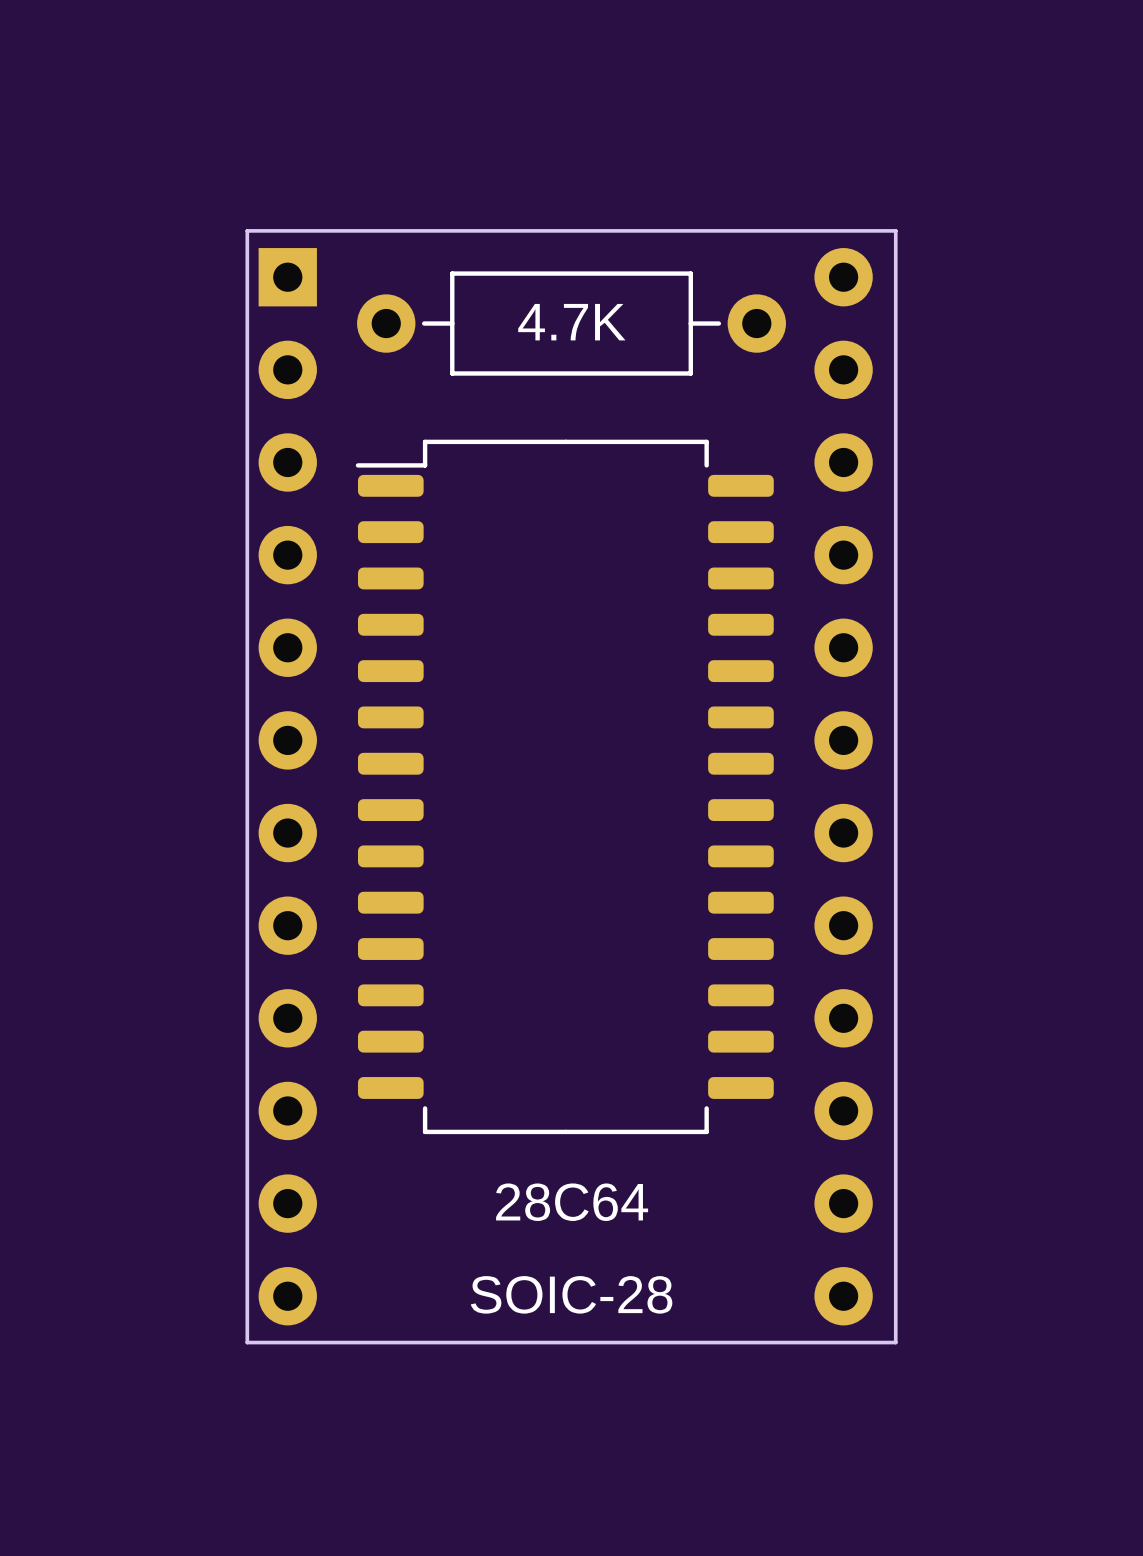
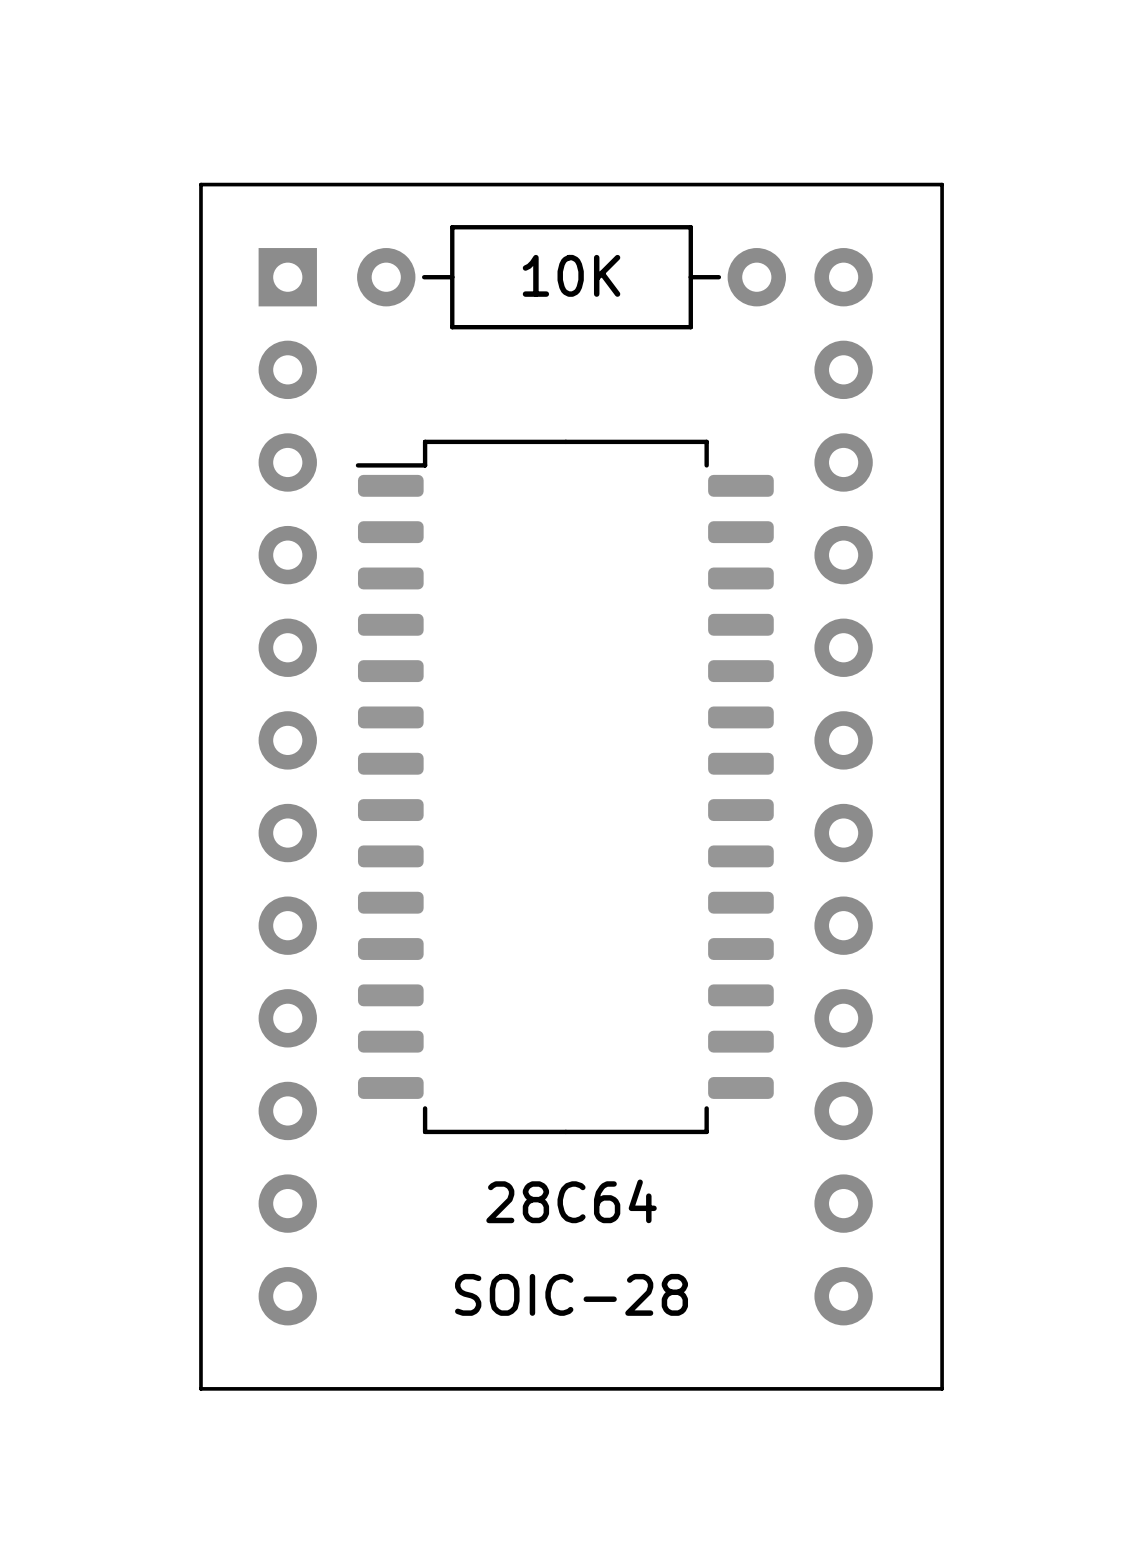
board edge: (247, 230) (895, 230) (895, 1342) (247, 1342) (247, 230) -> (200, 184) (200, 1388) (942, 1388) (942, 184) (200, 184)
10K: none -> (571, 277)
4.7K: (571, 323) -> none

